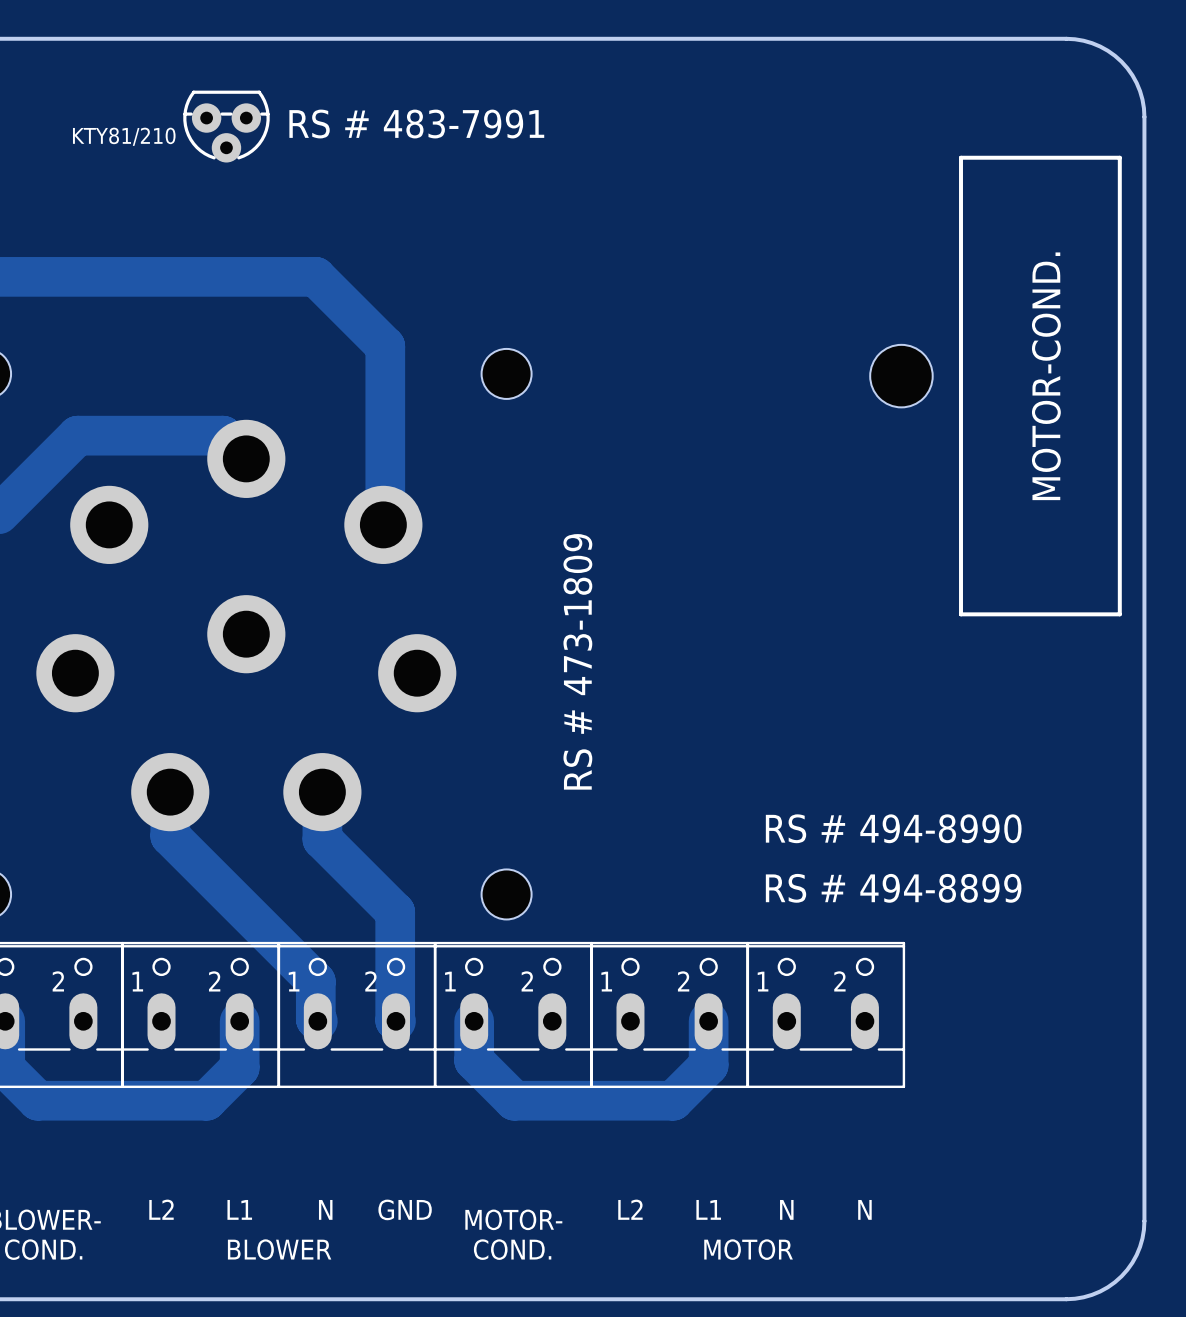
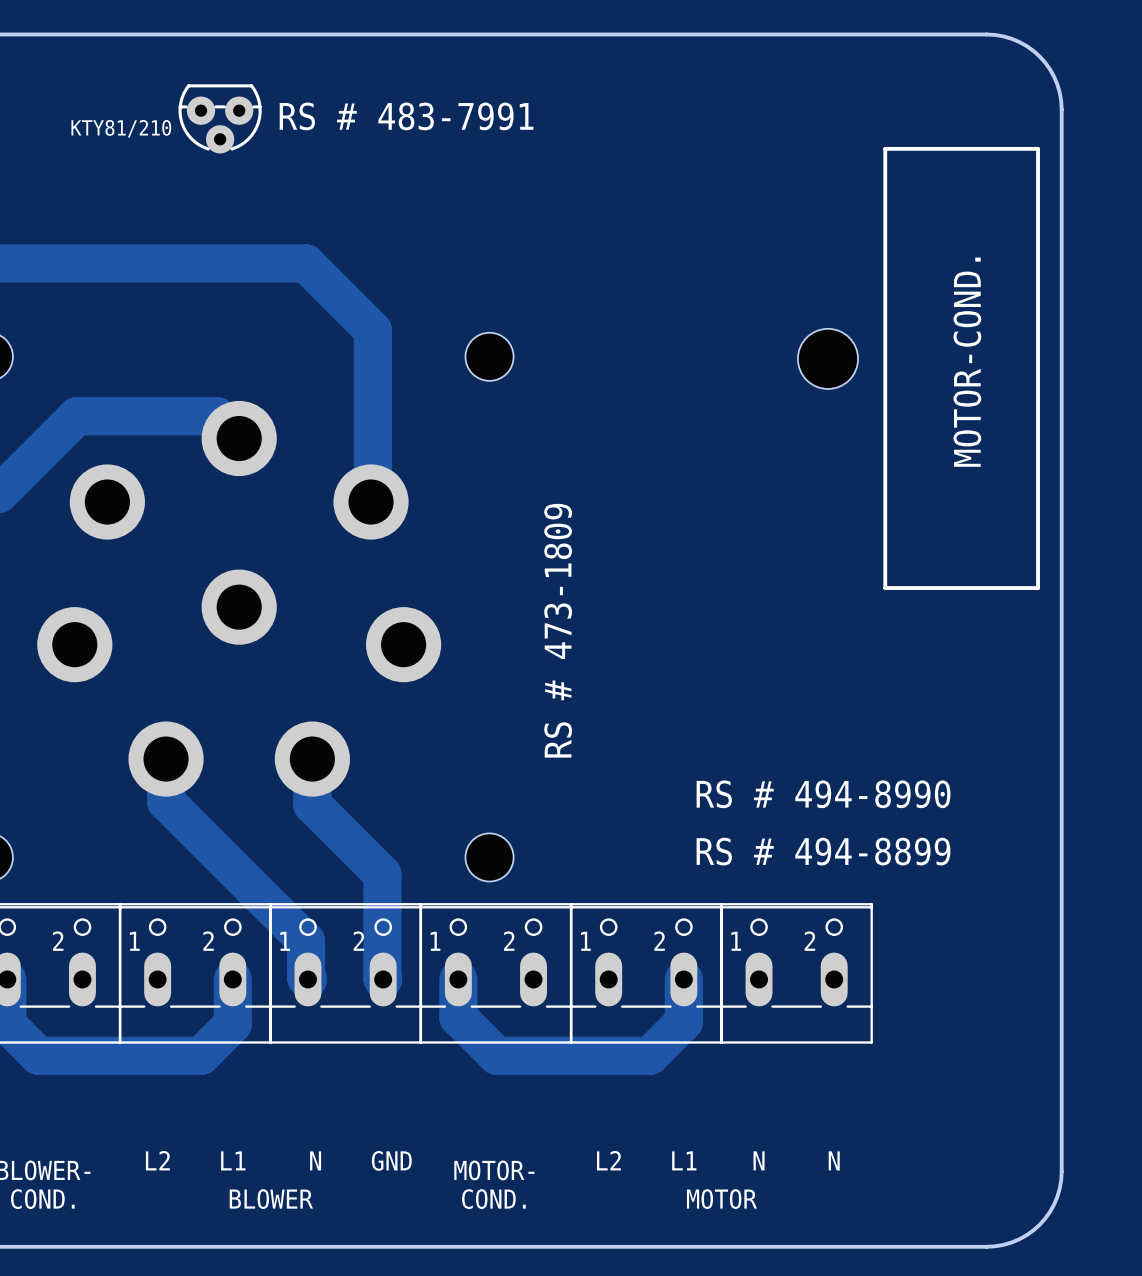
board edge: (1023, 38) (1075, 39) (1092, 43) (1107, 50) (1121, 61) (1132, 75) (1140, 91) (1144, 116) (1143, 1229) (1140, 1246) (1132, 1262) (1121, 1276) (1107, 1287) (1092, 1294) (1075, 1298) (1023, 1299) -> (986, 34) (1011, 38) (1026, 45) (1039, 56) (1050, 69) (1057, 84) (1061, 109) (1061, 1180) (1057, 1196) (1050, 1211) (1033, 1230) (1011, 1242) (986, 1246)
line: (961, 157) (961, 614) -> (926, 148) (885, 148) (885, 588) (926, 588)
line: (1076, 157) (1119, 157) (1119, 614) (1076, 614) -> (1038, 148) (1038, 588)
hole position: (901, 376) -> (827, 358)
text position: MOTOR-COND. (1046, 376) -> MOTOR-COND. (967, 362)
text position: RS # 494-8990 (893, 828) -> RS # 494-8990 (823, 794)
text position: RS # 494-8899 (893, 888) -> RS # 494-8899 (823, 851)

